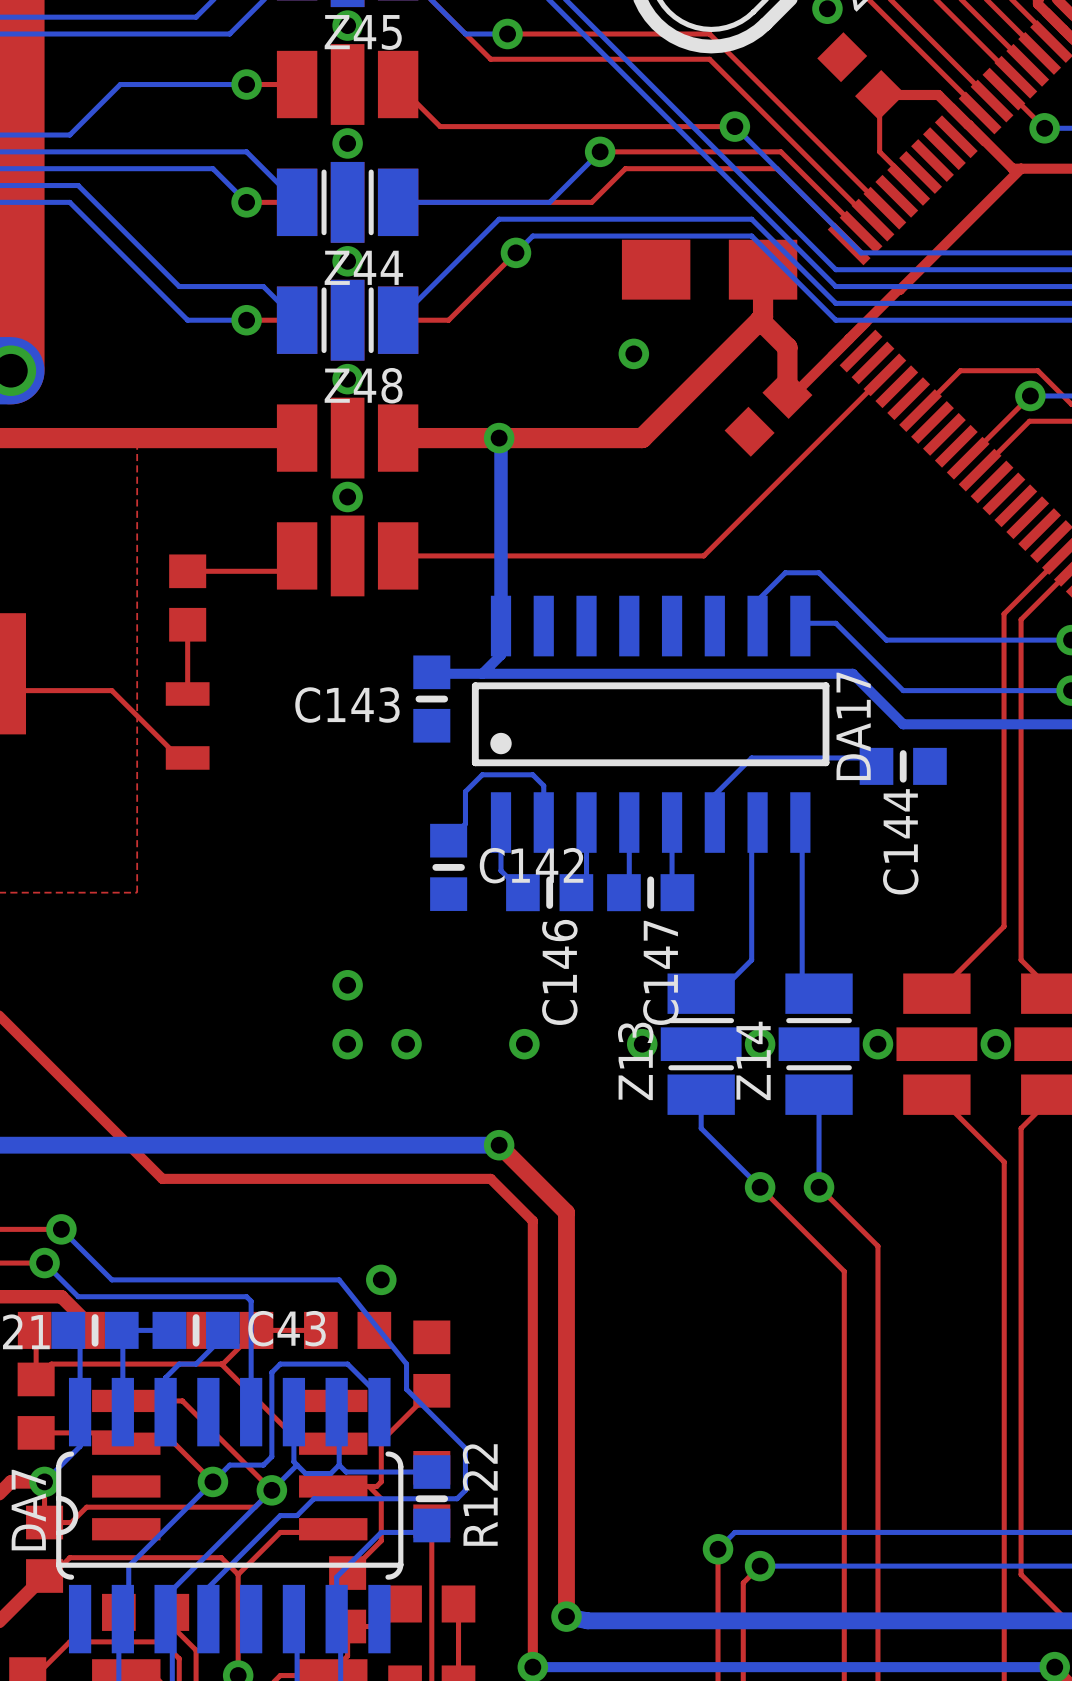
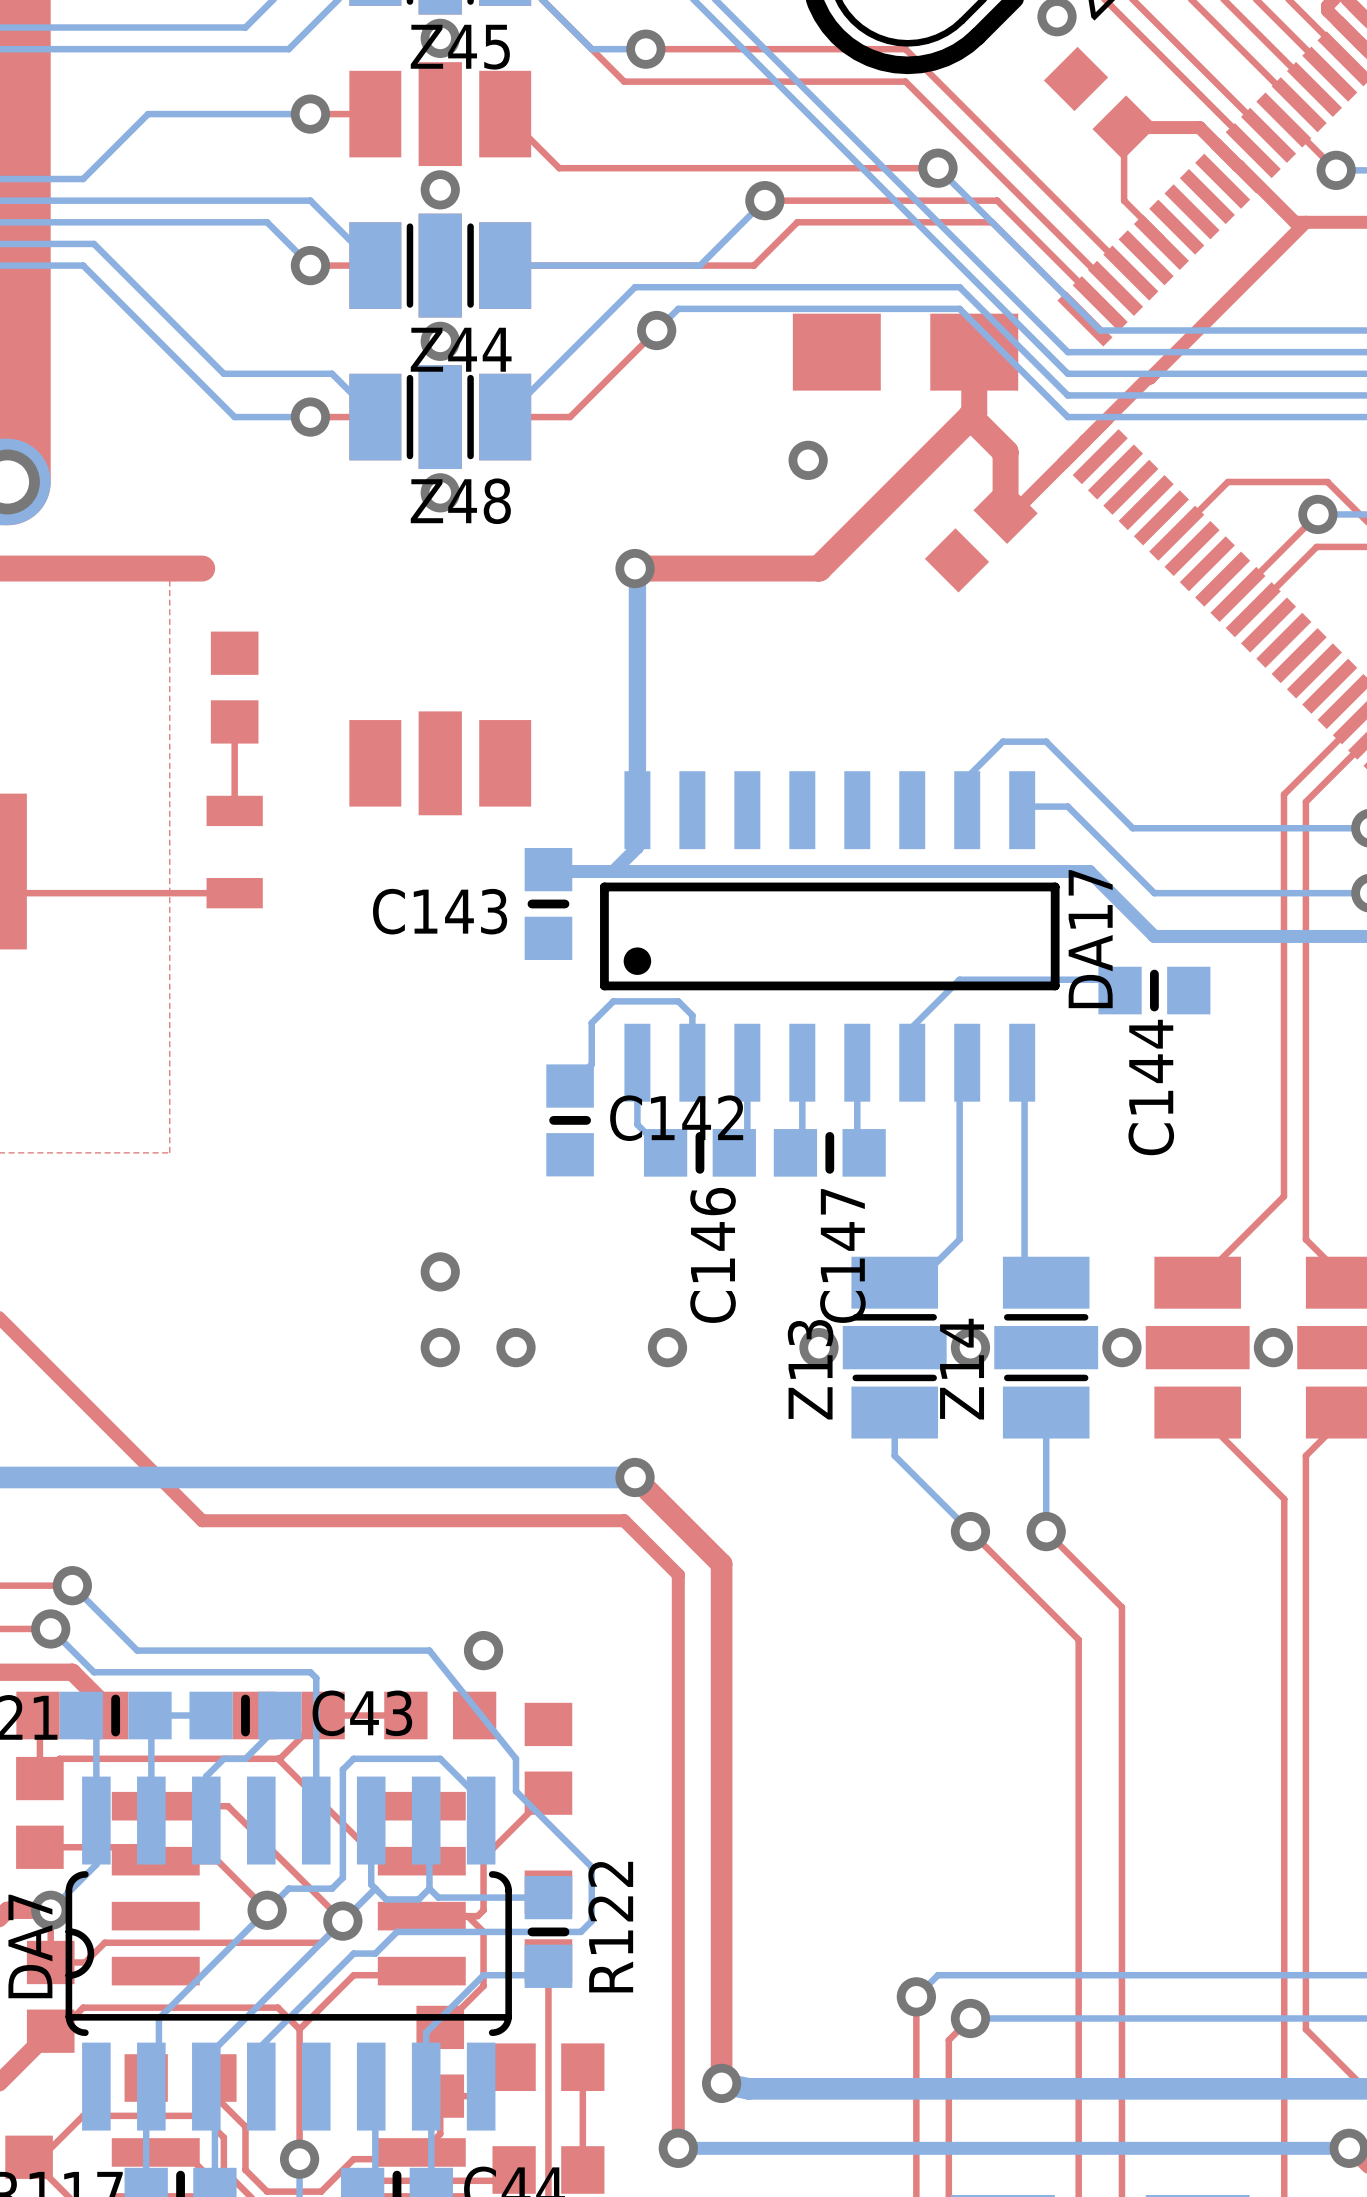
top track: (884, 374) (703, 555) (398, 555) -> none
top track: (297, 438) (162, 438) -> none
part: (347, 438) -> none
top track: (499, 438) (398, 438) -> none
via: (347, 497) -> none
top track: none -> (245, 720) (234, 730) (234, 808)
top track: (297, 555) (281, 571) (187, 571) -> none
part position: (347, 555) -> (440, 763)
part position: (187, 598) -> (234, 687)
top track: (187, 626) (187, 693) -> none
top track: (111, 690) (179, 757) -> (137, 893) (234, 893)
part position: (187, 725) -> (234, 852)

